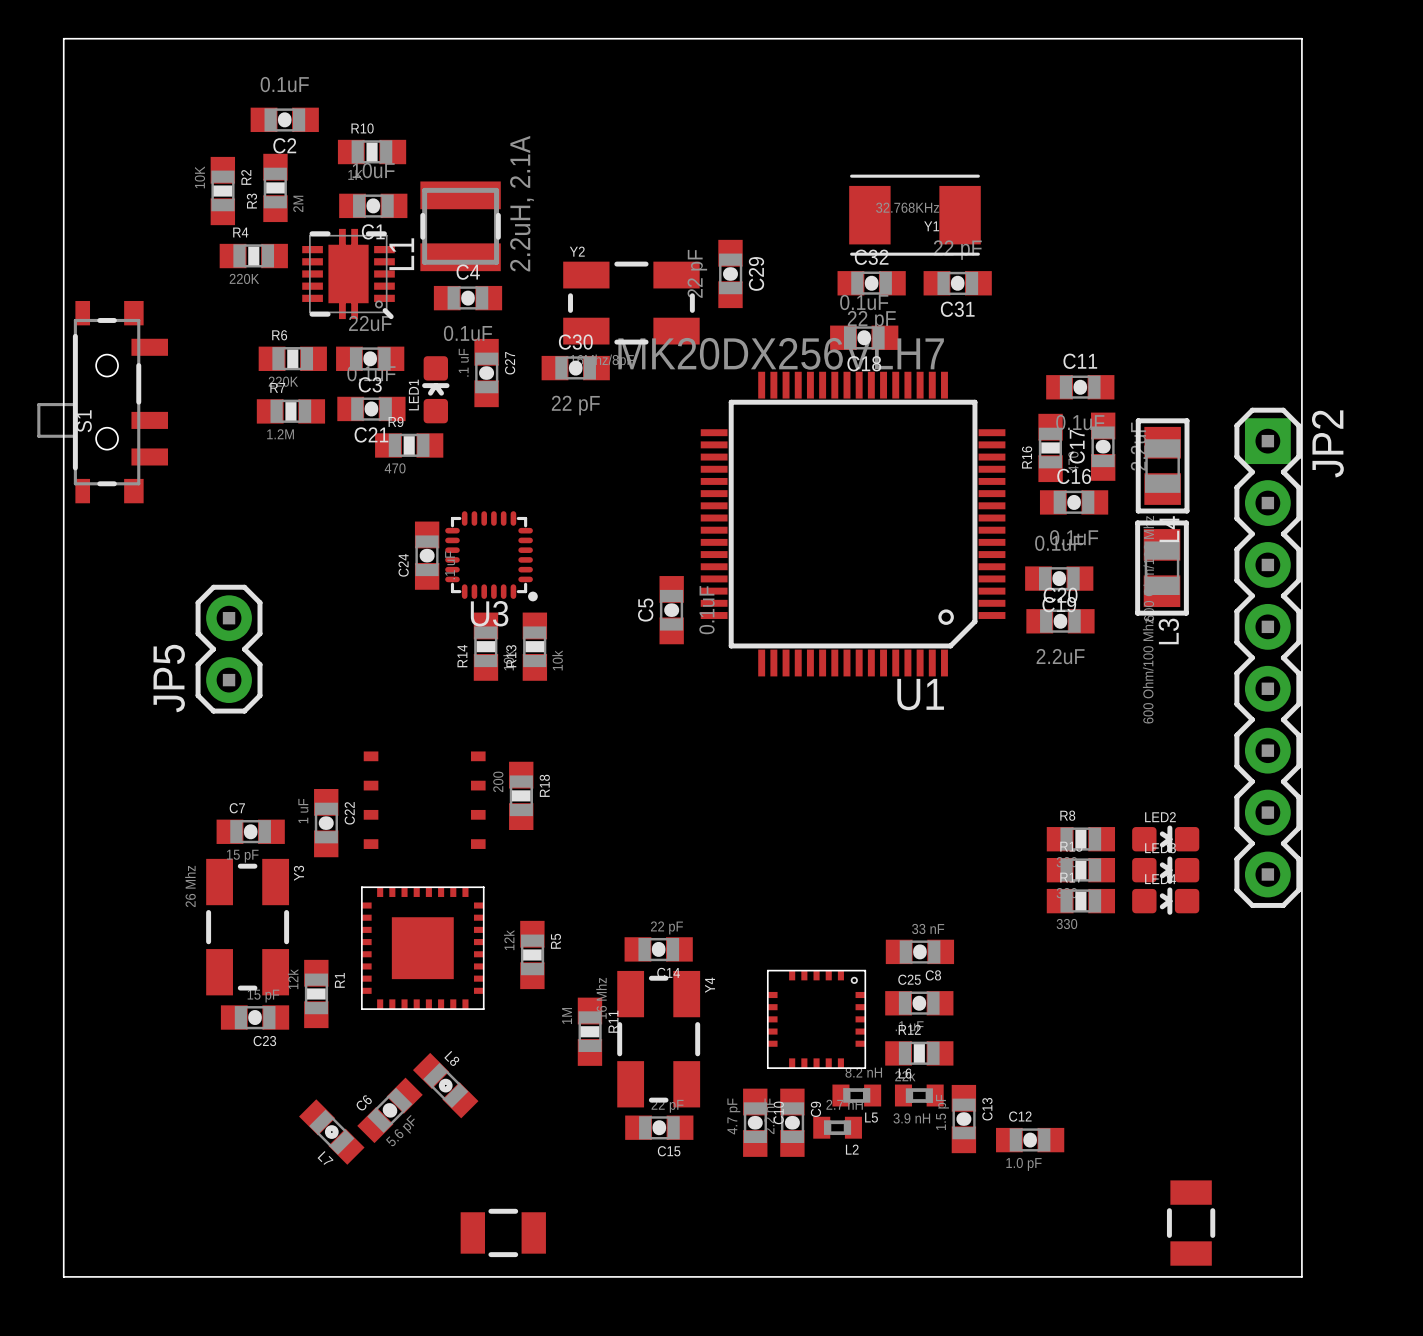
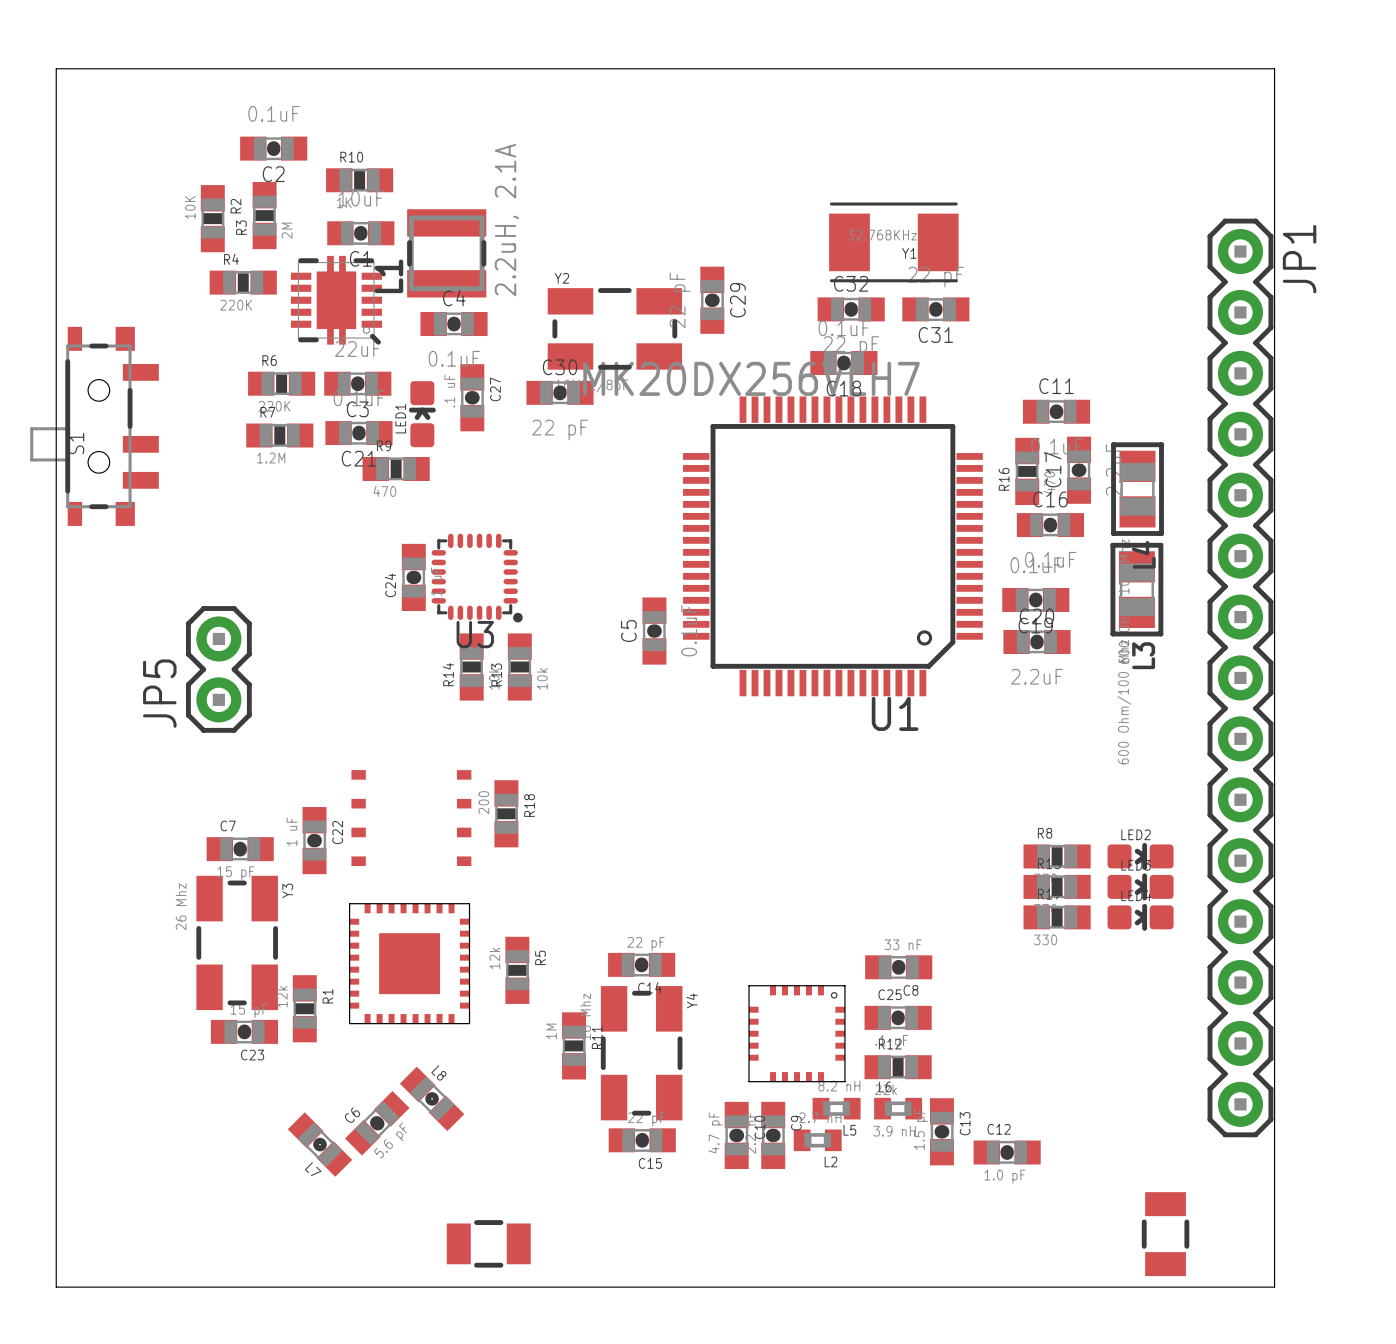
JP2: (1267, 657) -> none
JP1: none -> (1240, 677)

